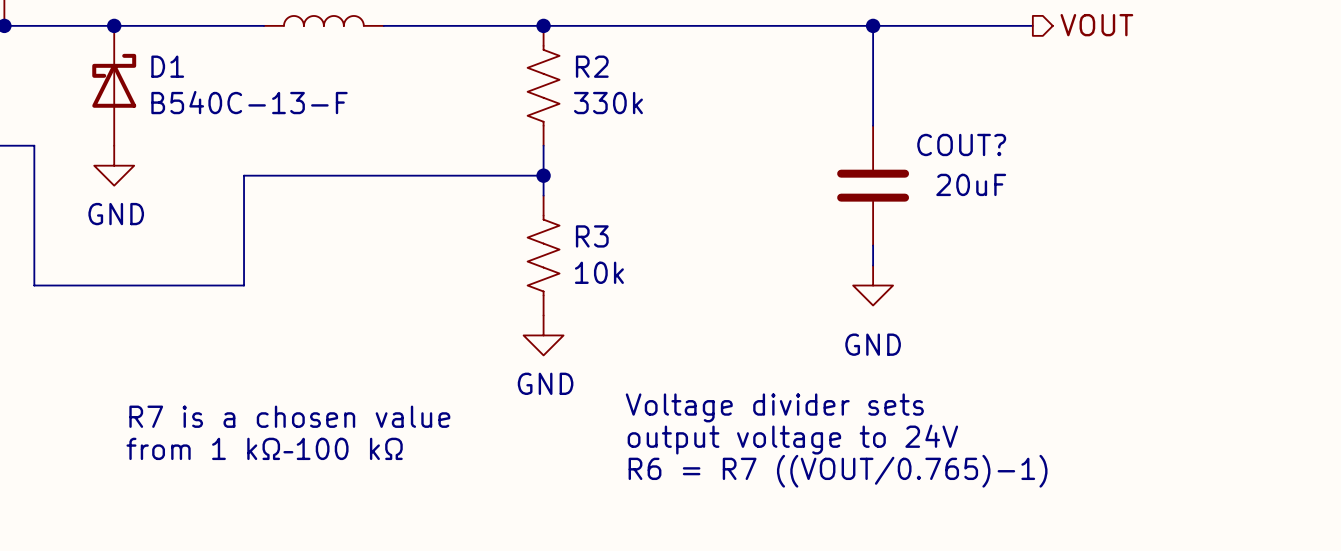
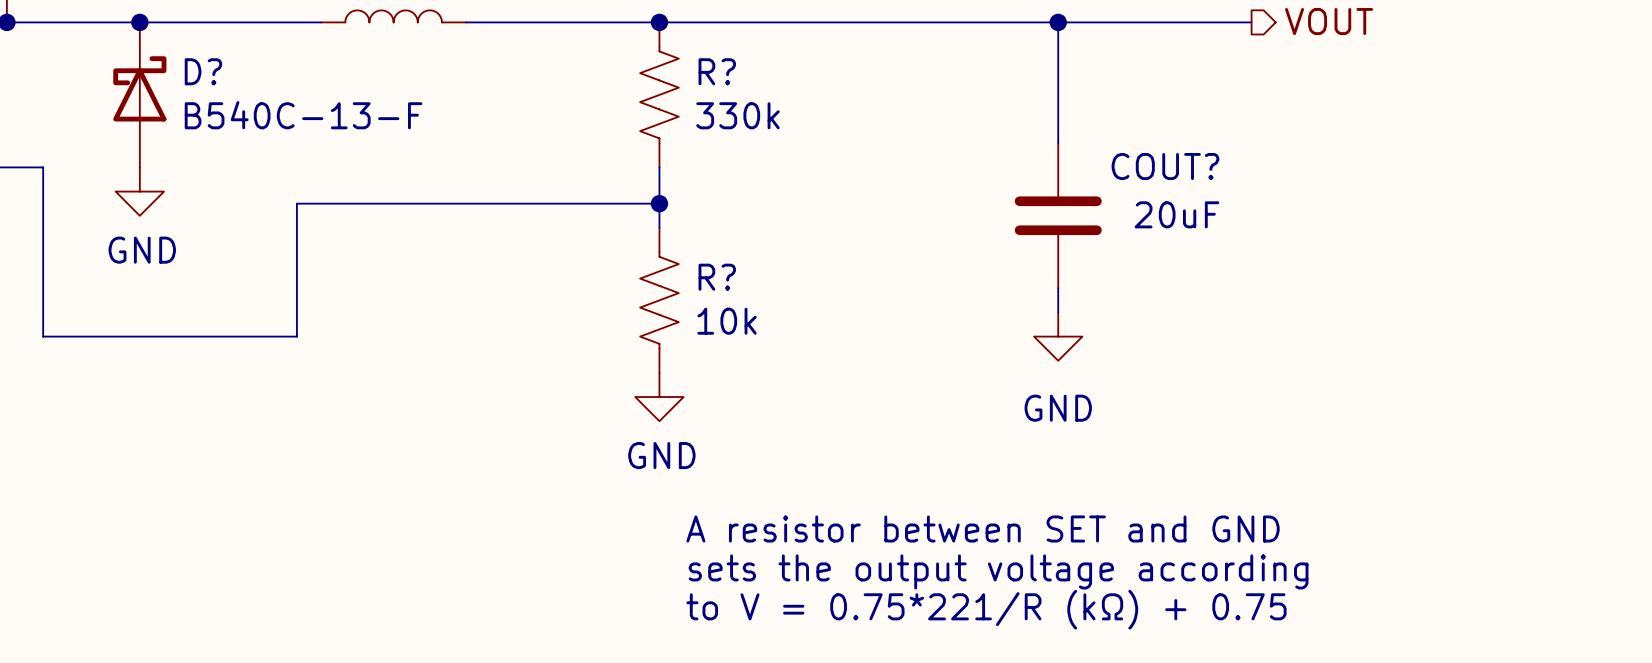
D1 name: D1 (167, 66) -> D? (203, 71)
R2 name: R2 (592, 66) -> R? (717, 71)
R3 name: R3 (592, 236) -> R? (717, 277)
text: Voltage divider sets (774, 407) -> none
text: R7 is a chosen value (289, 416) -> none
text: output voltage to 24V (792, 439) -> none
text: none -> A resistor between SET and GND (983, 528)
text: from 1 kΩ–100 kΩ (264, 448) -> none
text: R6 = R7 ((VOUT/0.765)-1) (838, 471) -> none
text: none -> sets the output voltage according (998, 571)
text: none -> to V = 0.75*221/R (kΩ) + 0.75 (986, 609)

